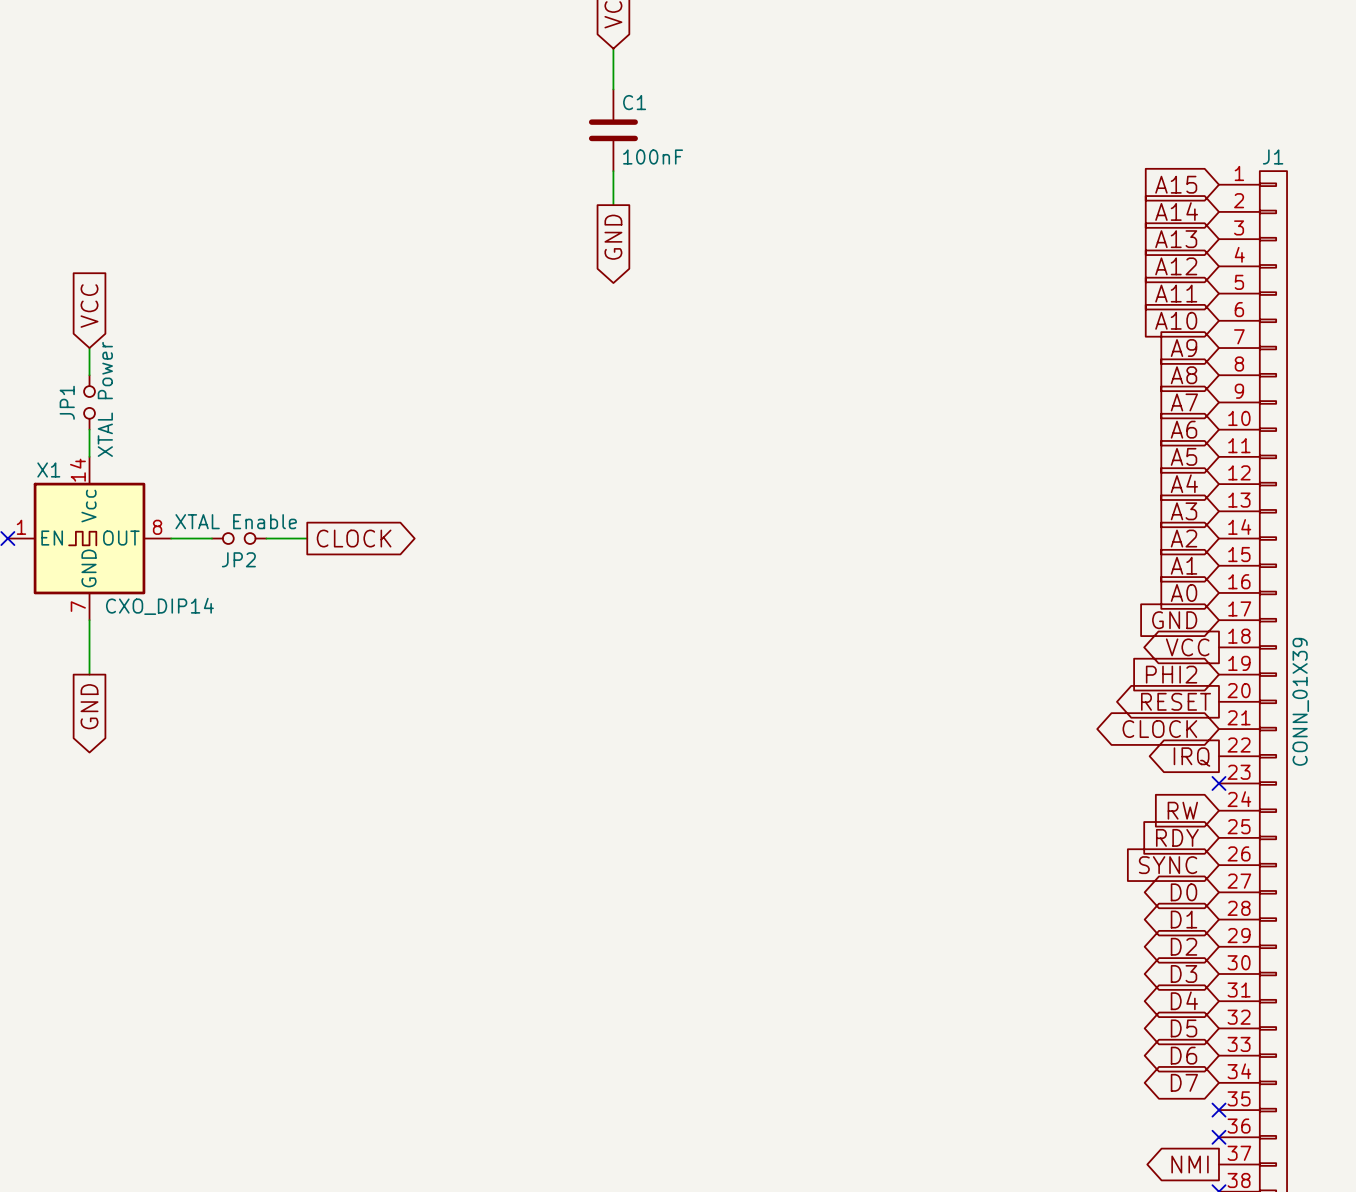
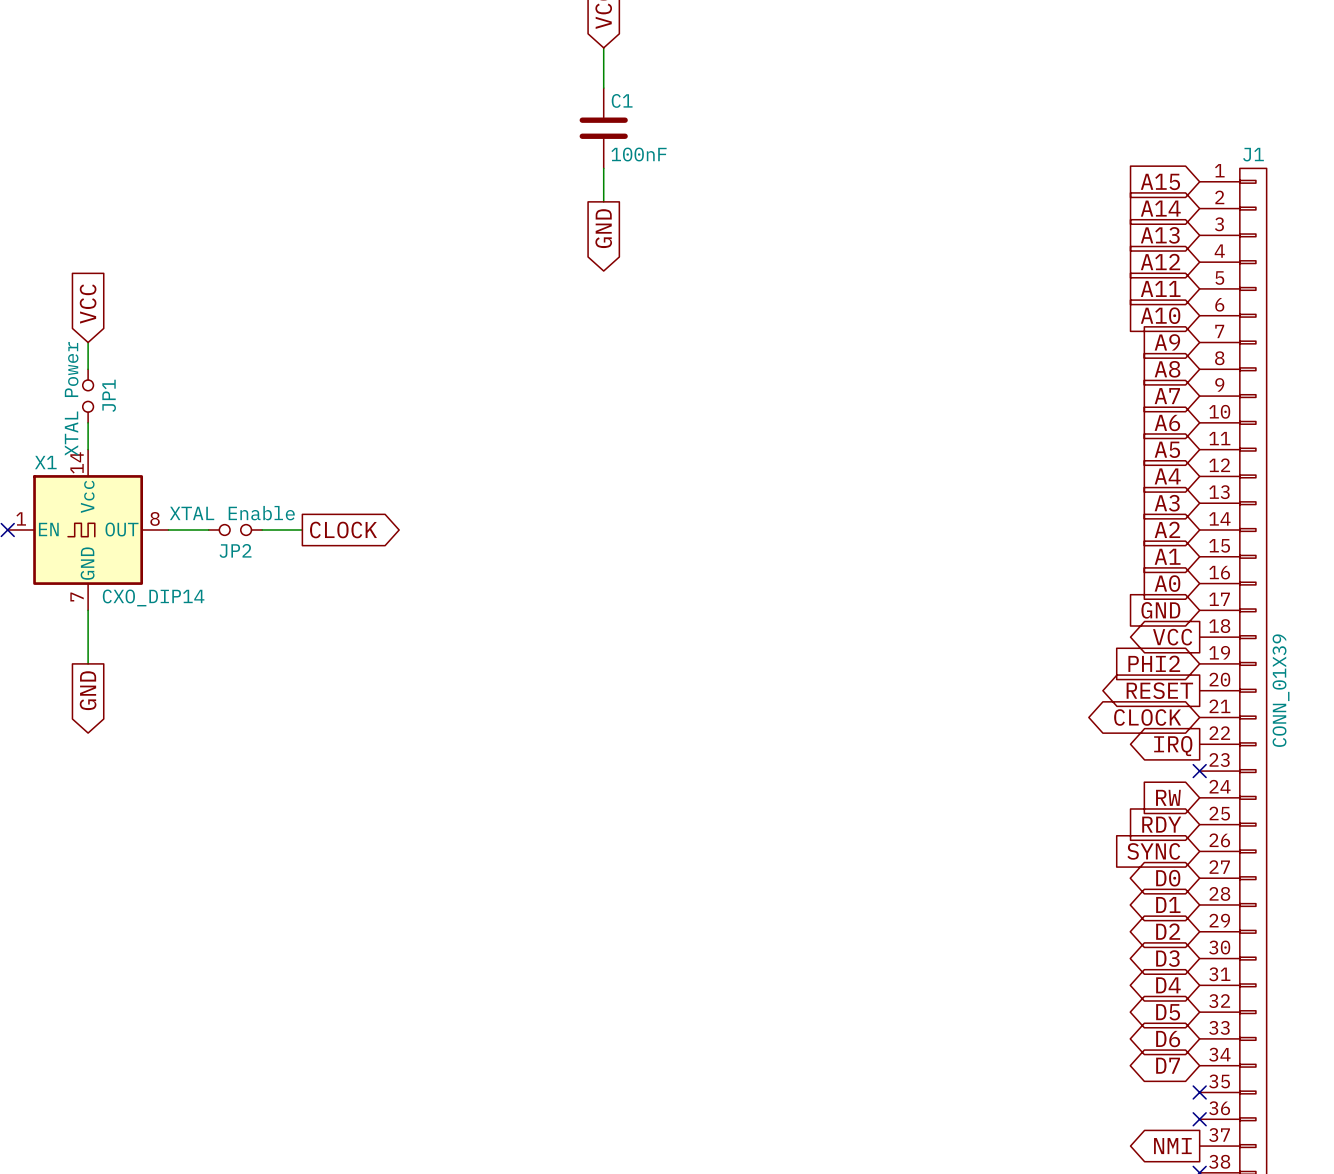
JP1 value position: XTAL Power (105, 399) -> XTAL Power (71, 398)
JP1 name position: JP1 (67, 402) -> JP1 (109, 395)

